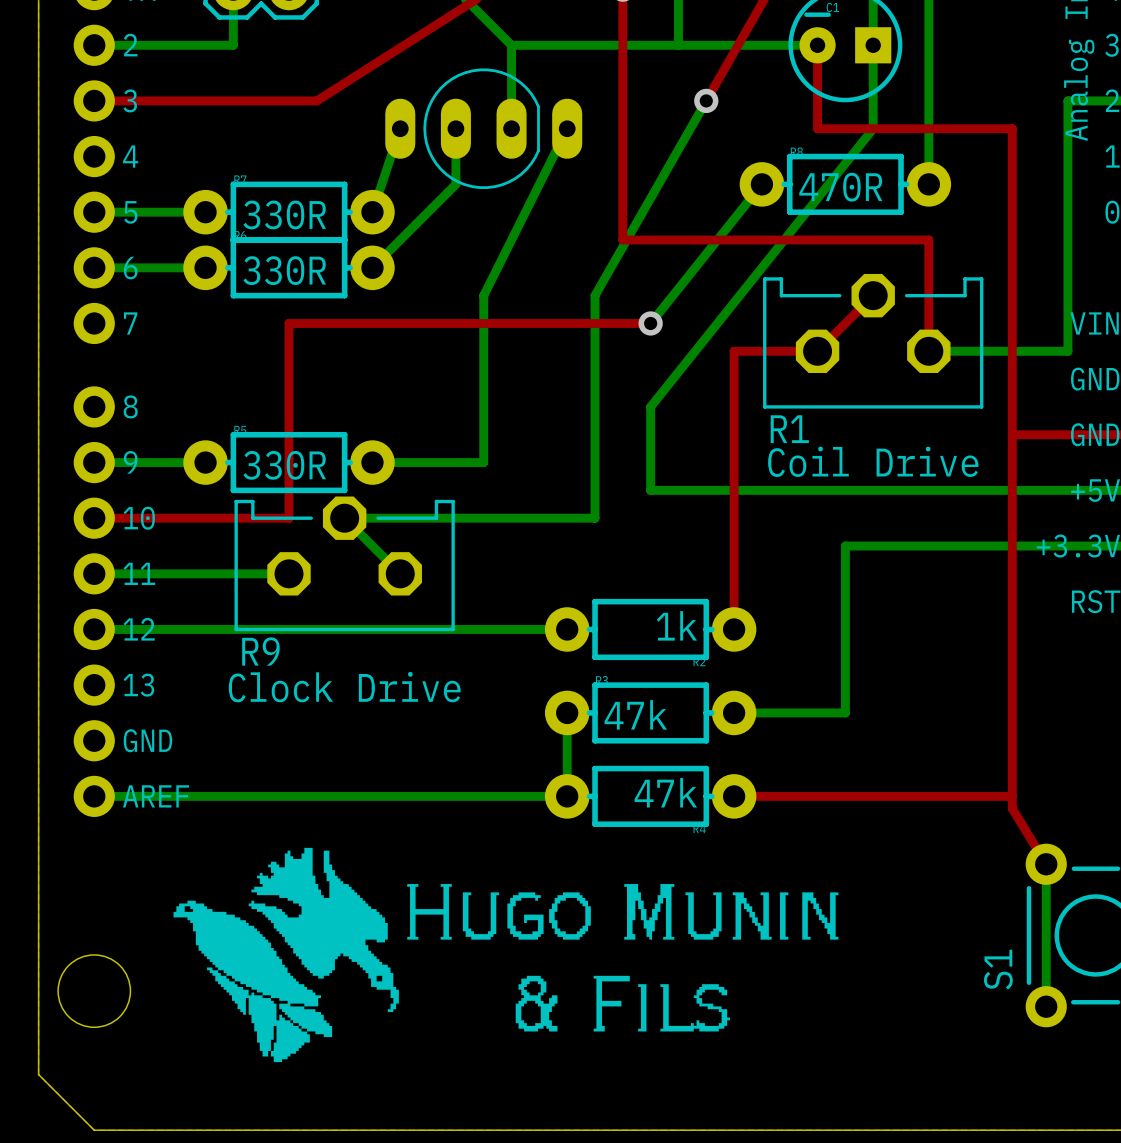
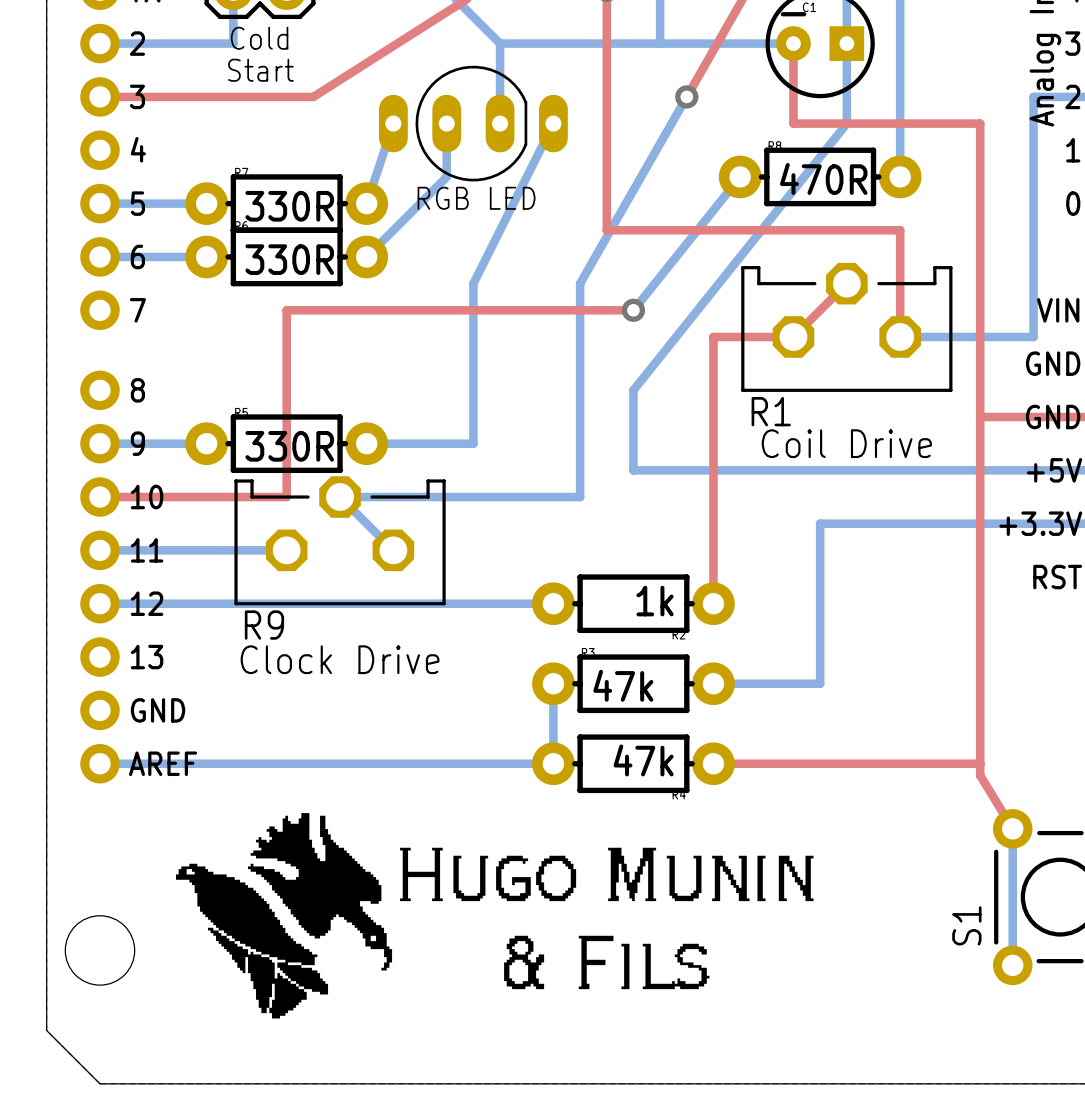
text: none -> Cold (259, 38)
text: none -> Start (260, 70)
text: none -> RGB LED (476, 198)

